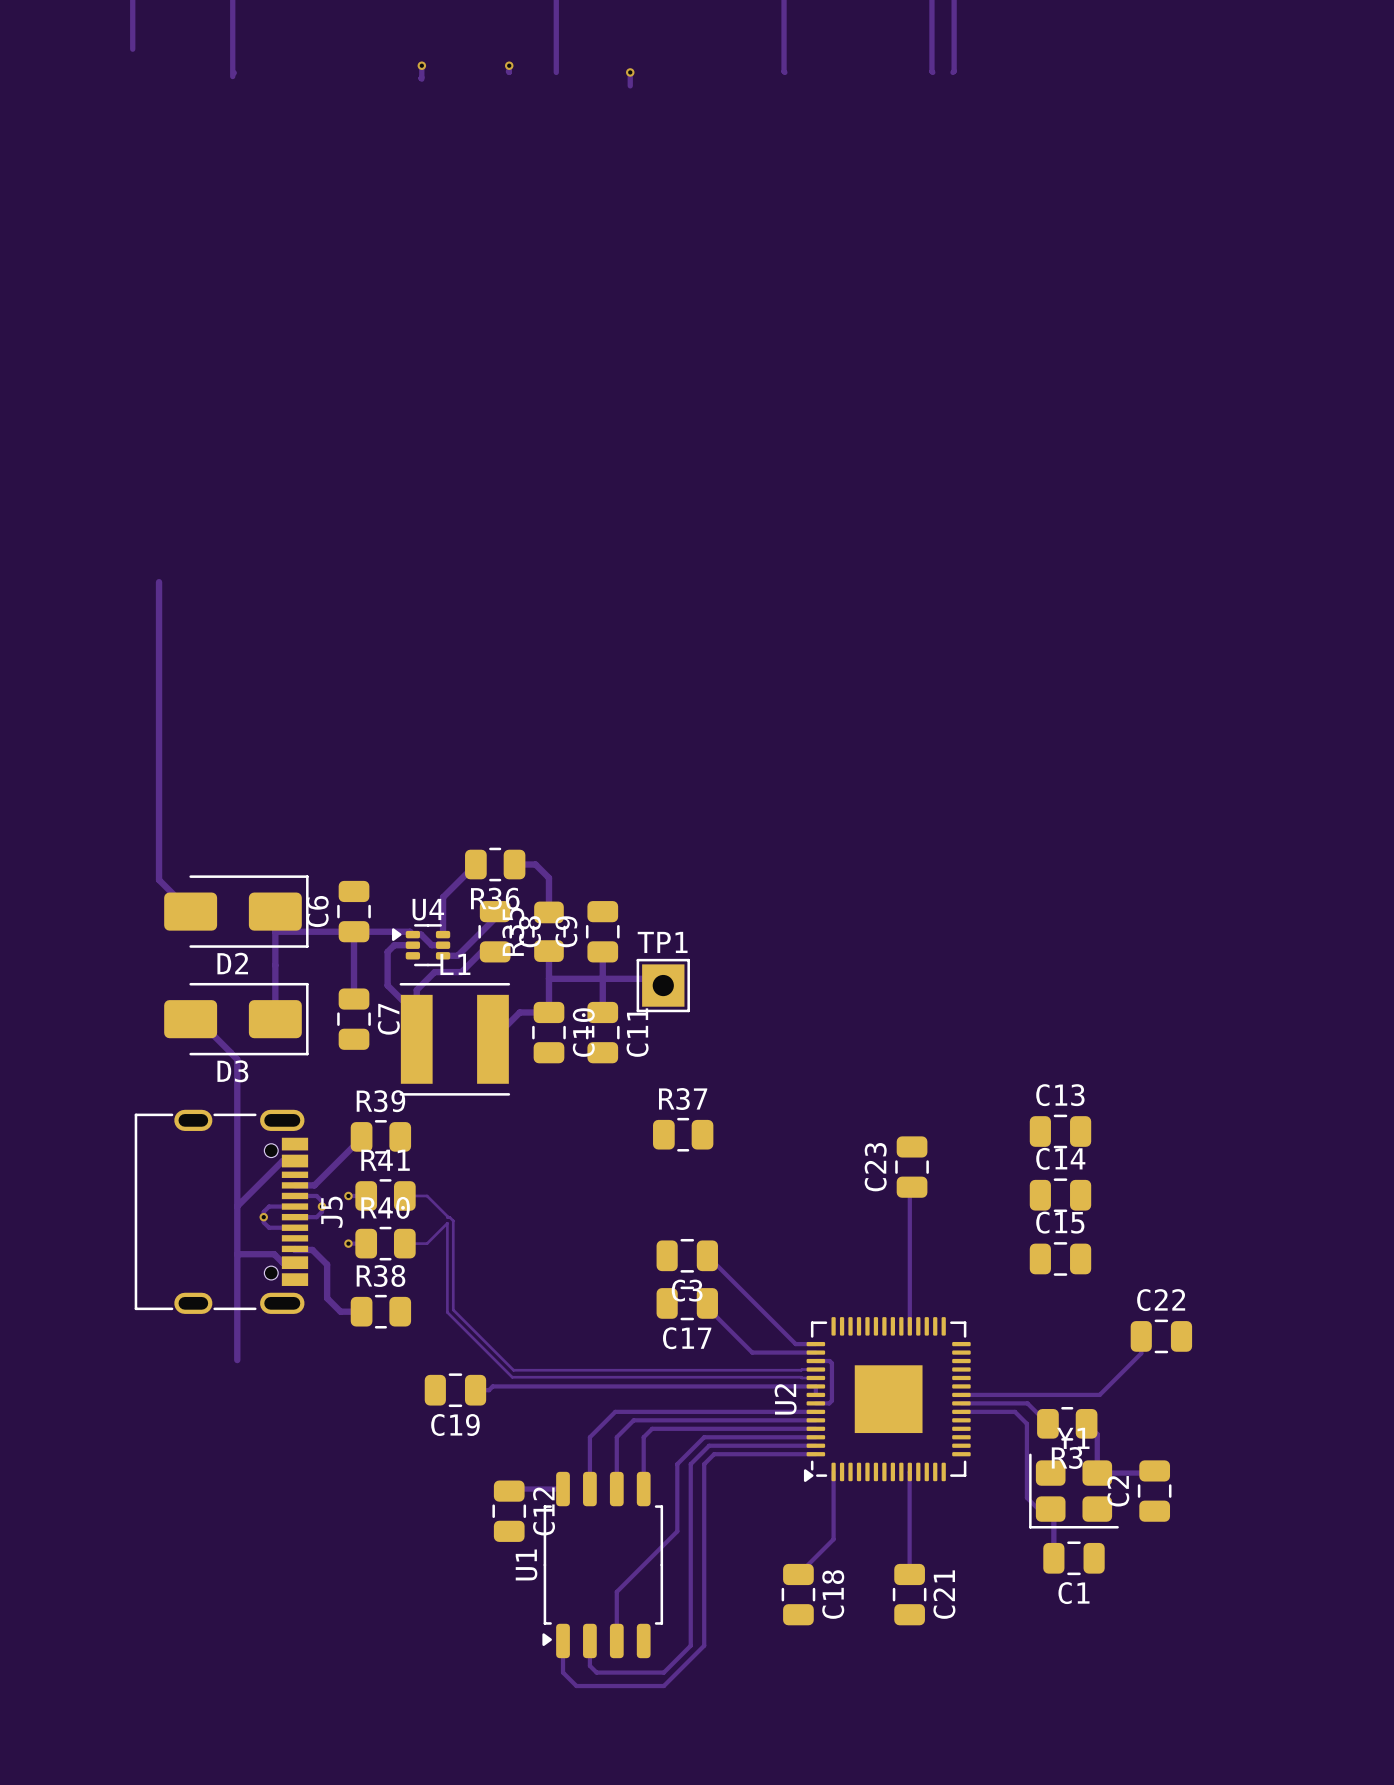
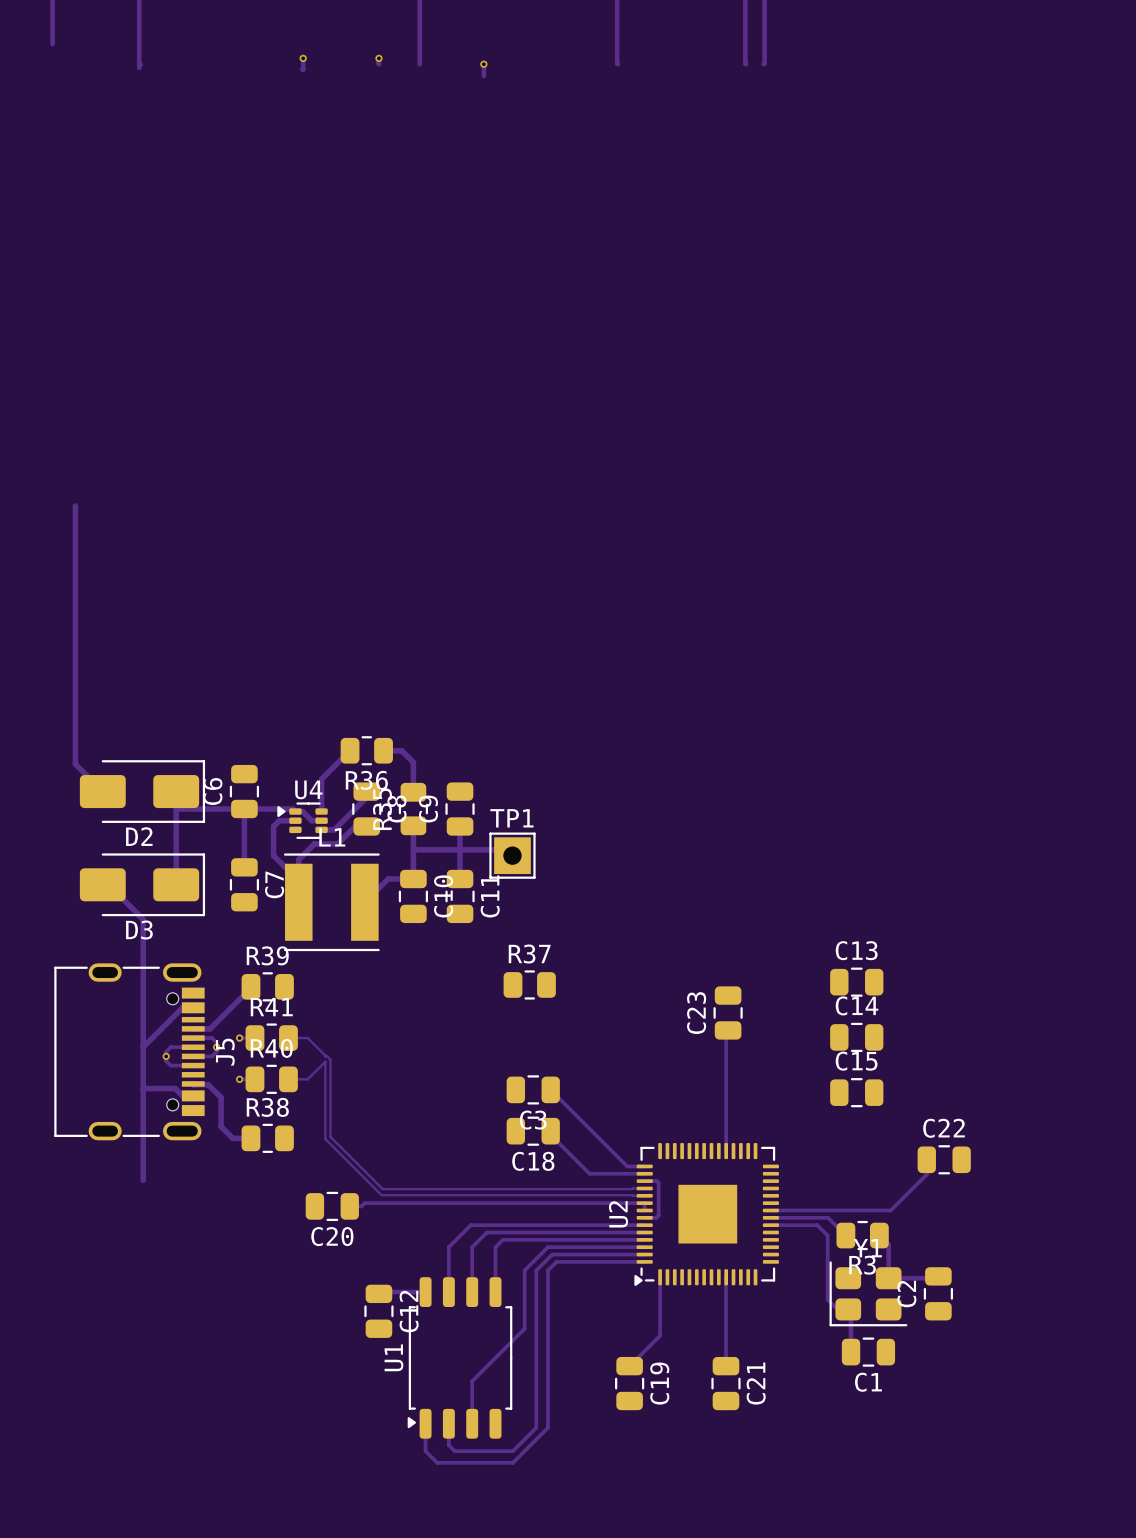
C17 name: C17 (687, 1338) -> C18 (533, 1161)
C19 name: C19 (455, 1425) -> C20 (332, 1236)
C18 name: C18 (833, 1594) -> C19 (659, 1383)

